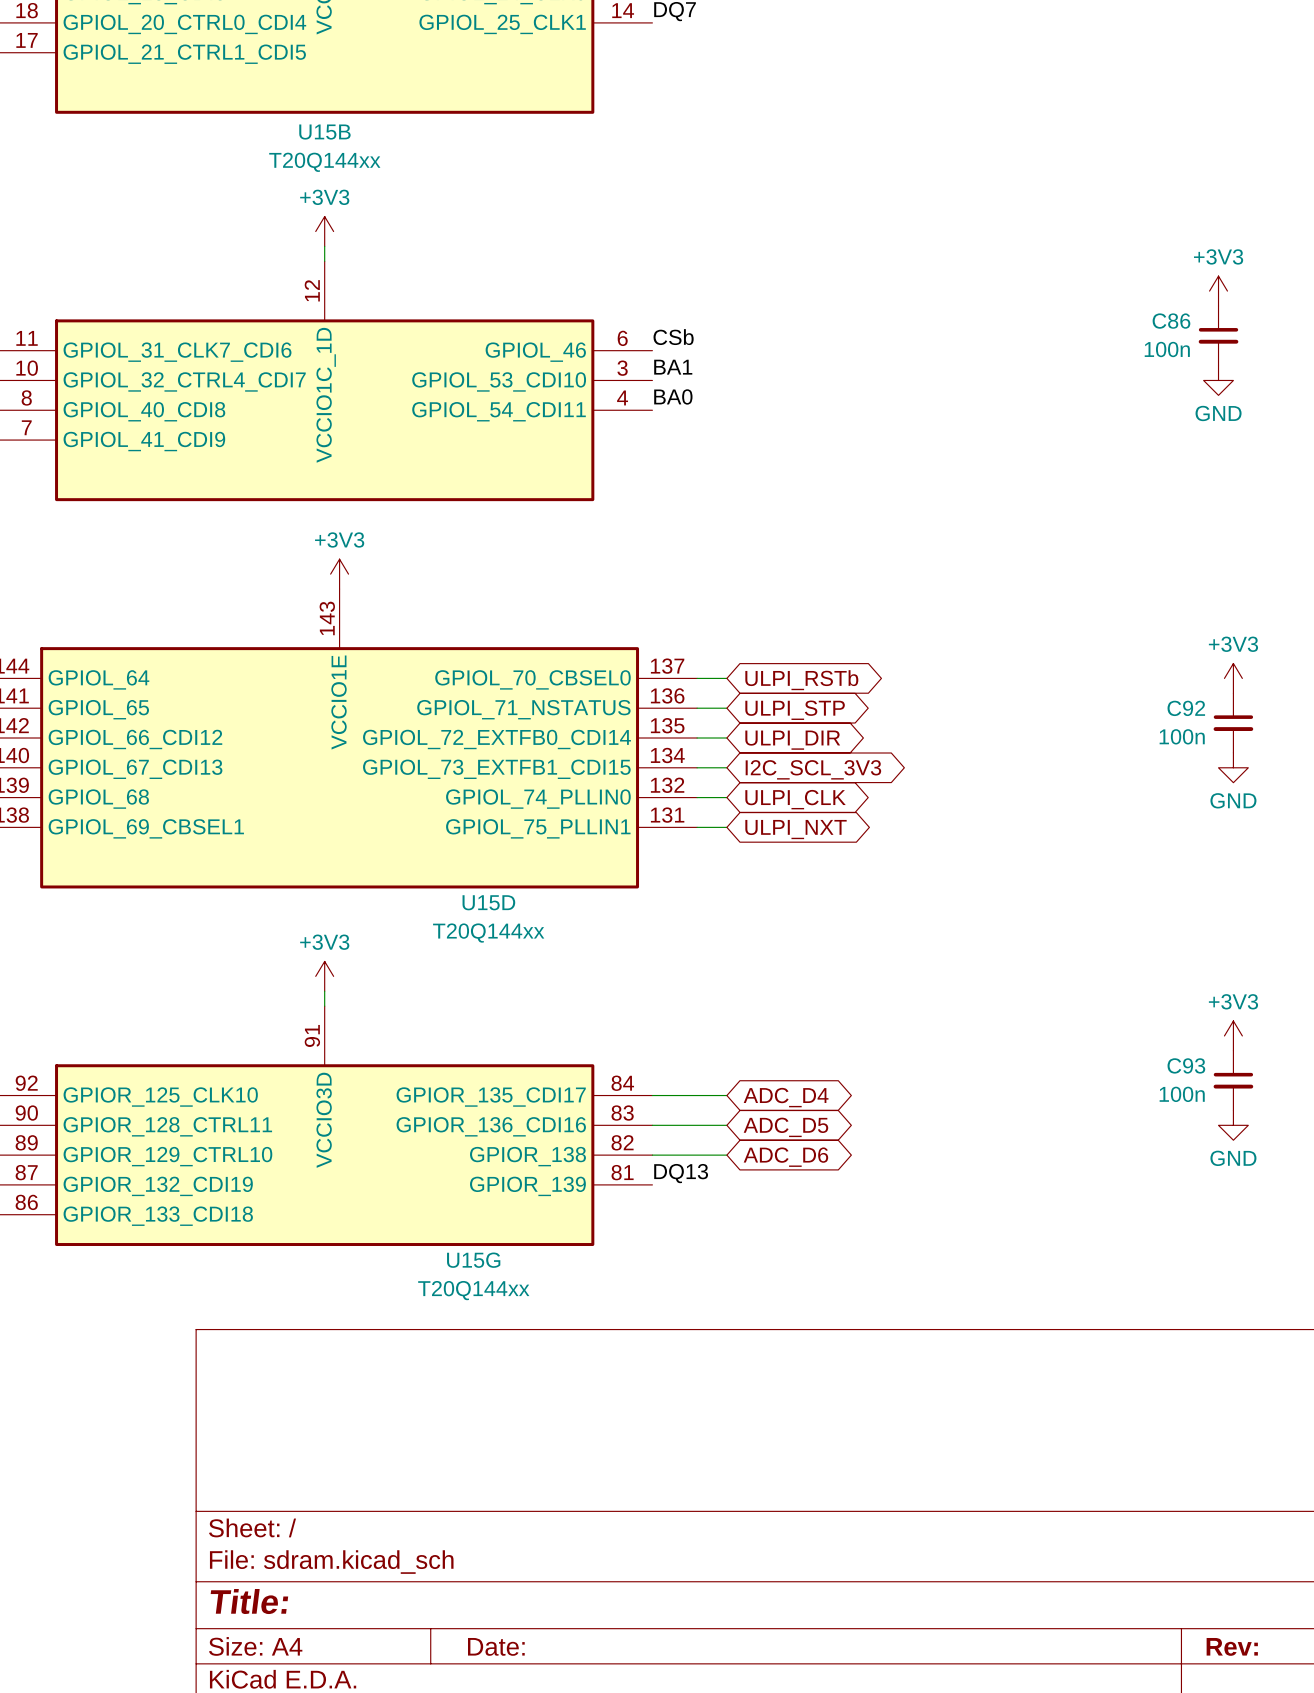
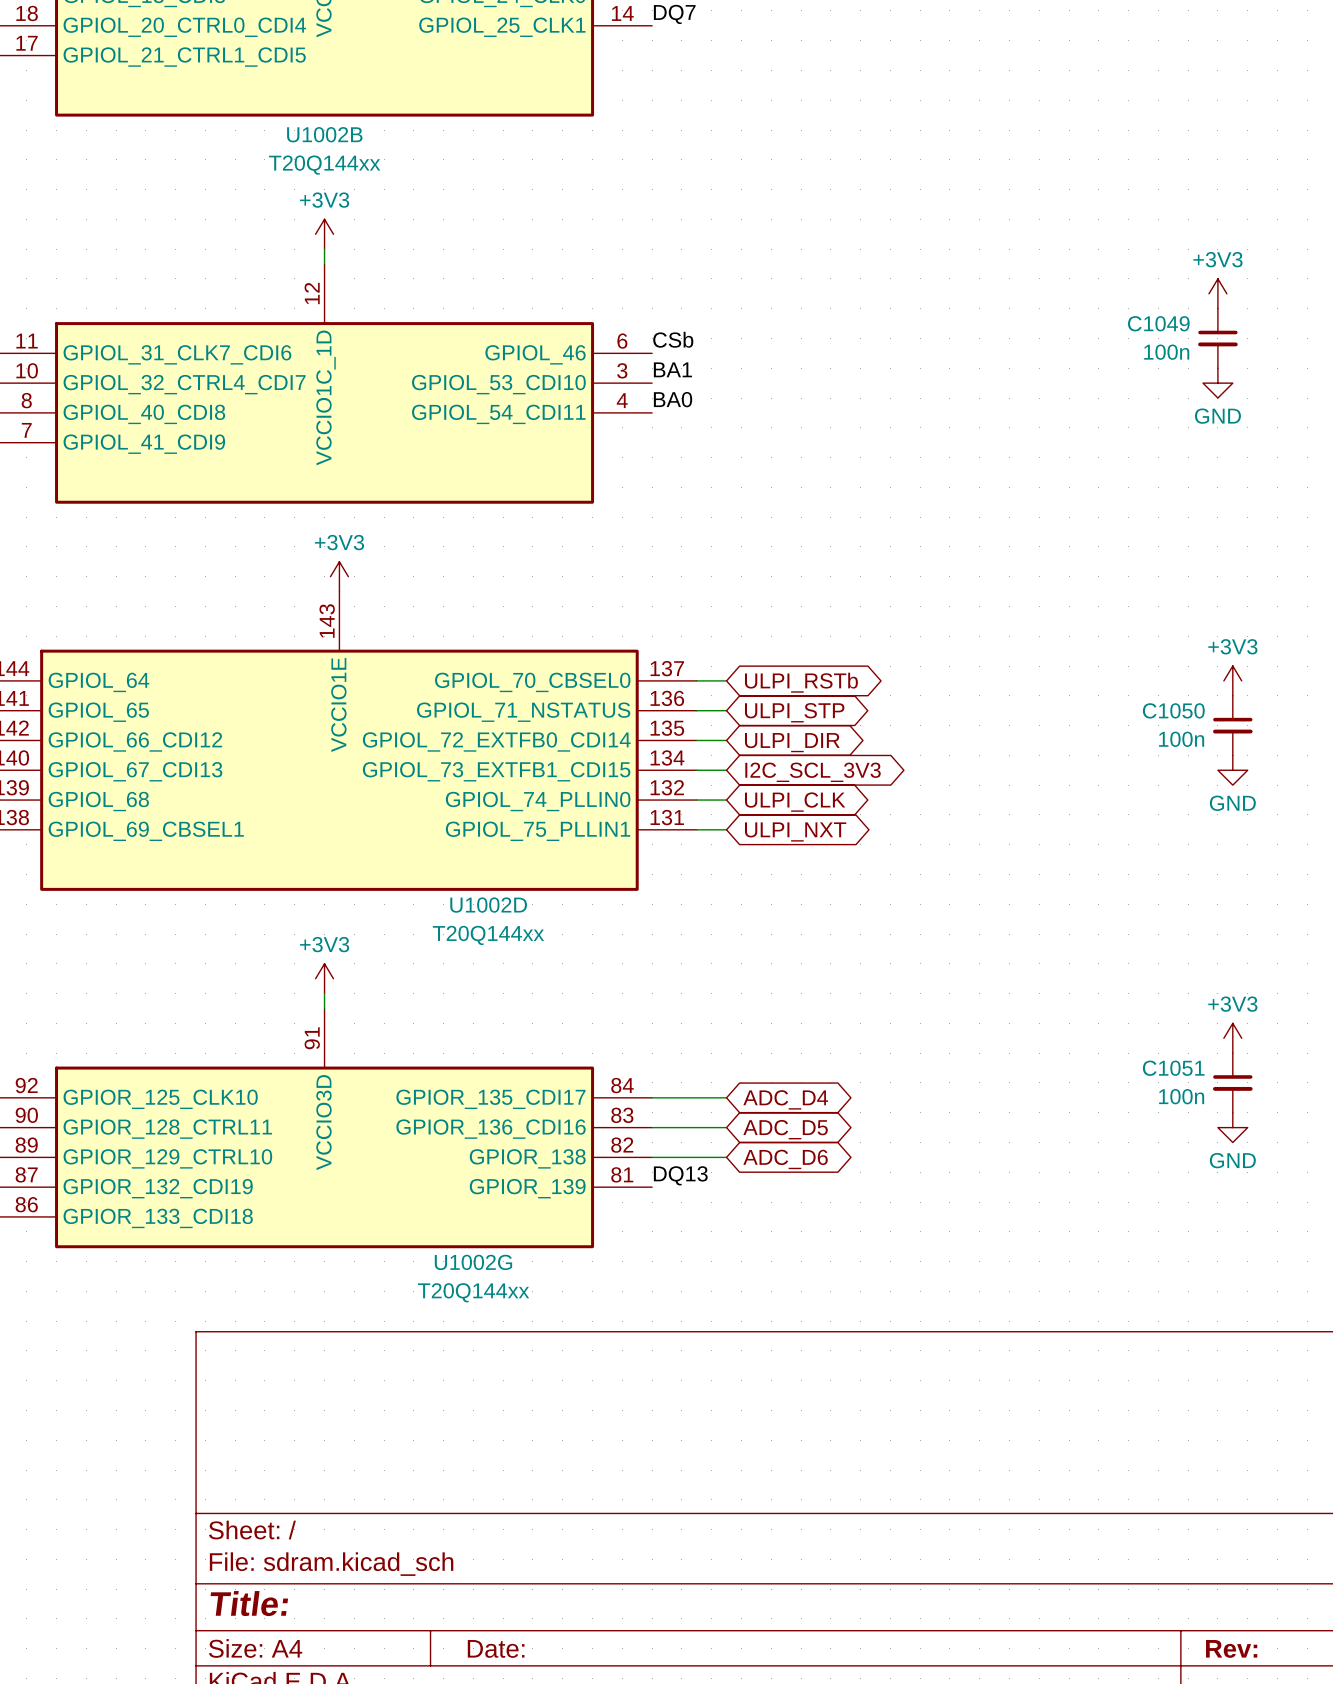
U15B name: U15B (324, 132) -> U1002B (324, 134)
C86 name: C86 (1171, 321) -> C1049 (1158, 323)
C92 name: C92 (1186, 708) -> C1050 (1173, 710)
U15D name: U15D (488, 902) -> U1002D (488, 905)
C93 name: C93 (1186, 1065) -> C1051 (1173, 1068)
U15G name: U15G (473, 1260) -> U1002G (473, 1262)

